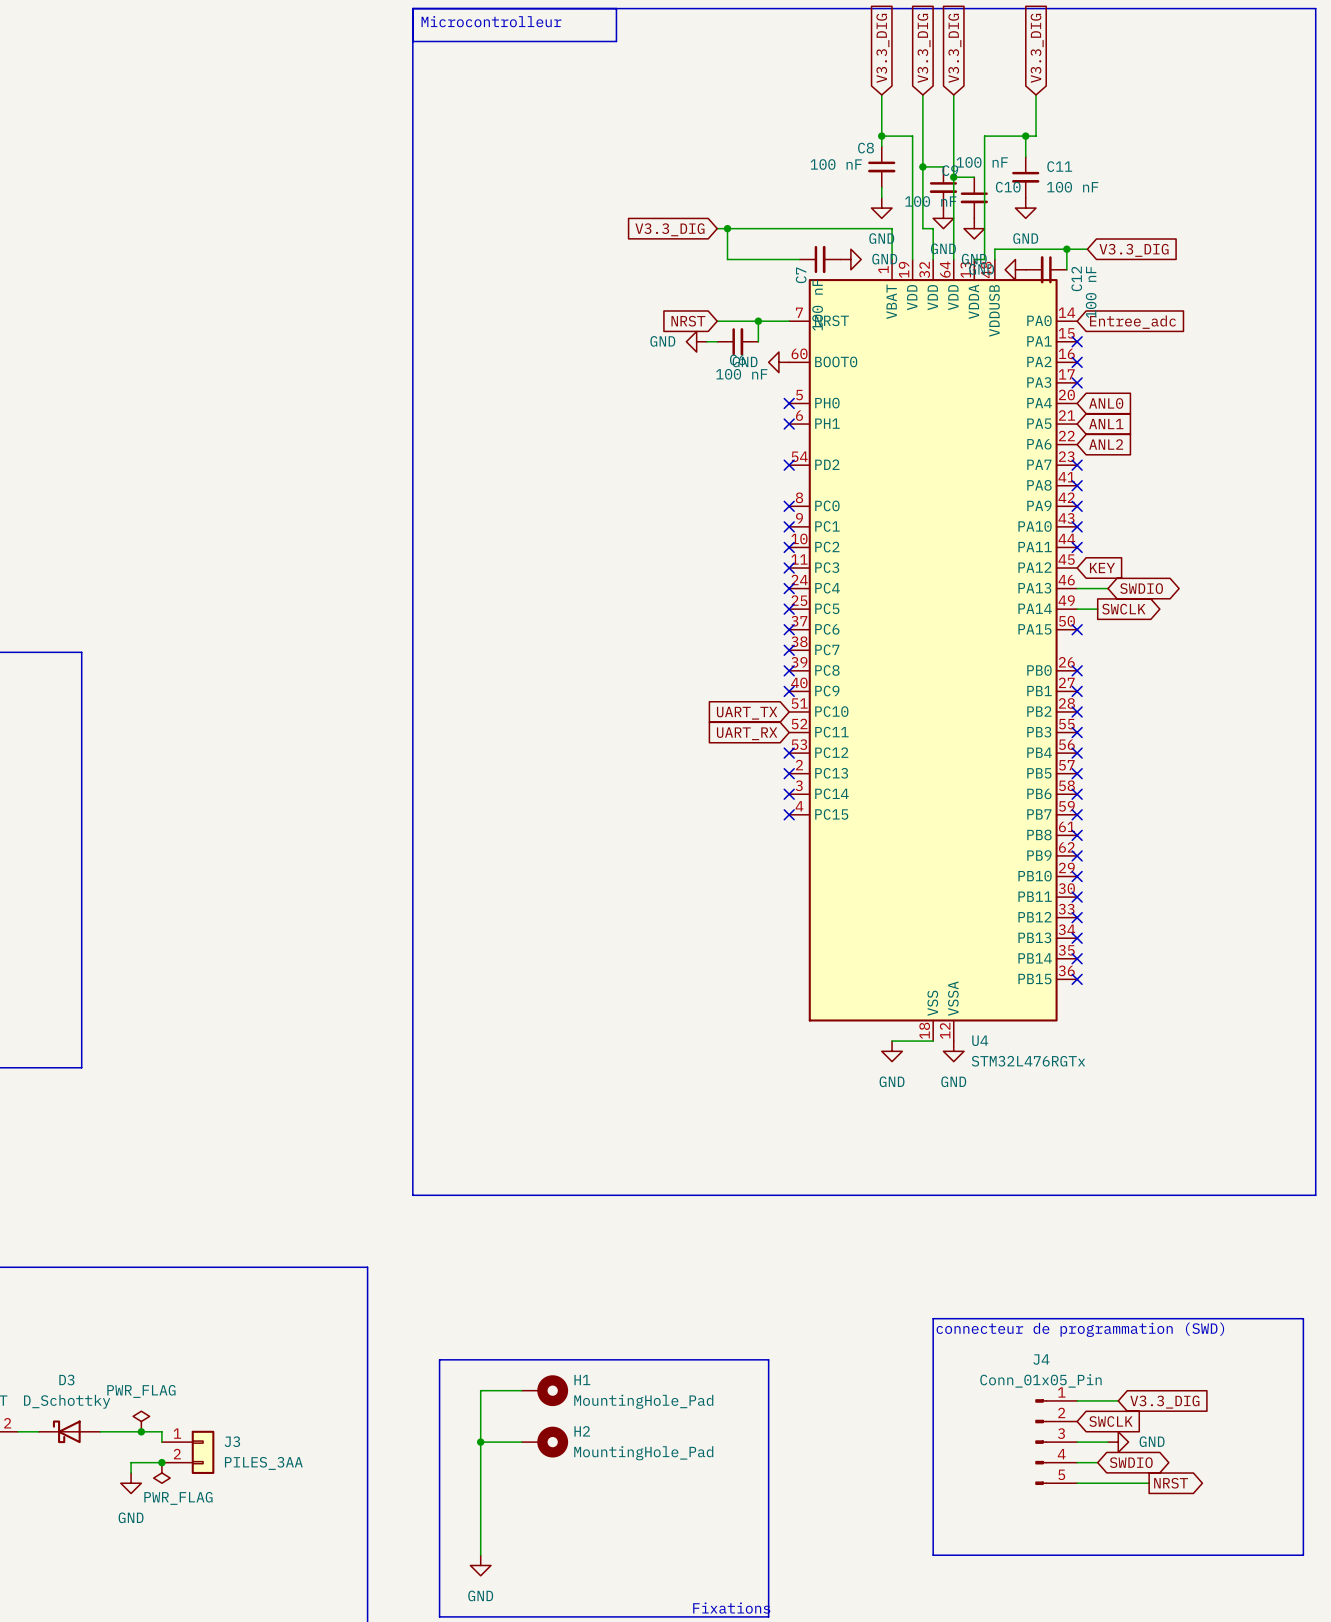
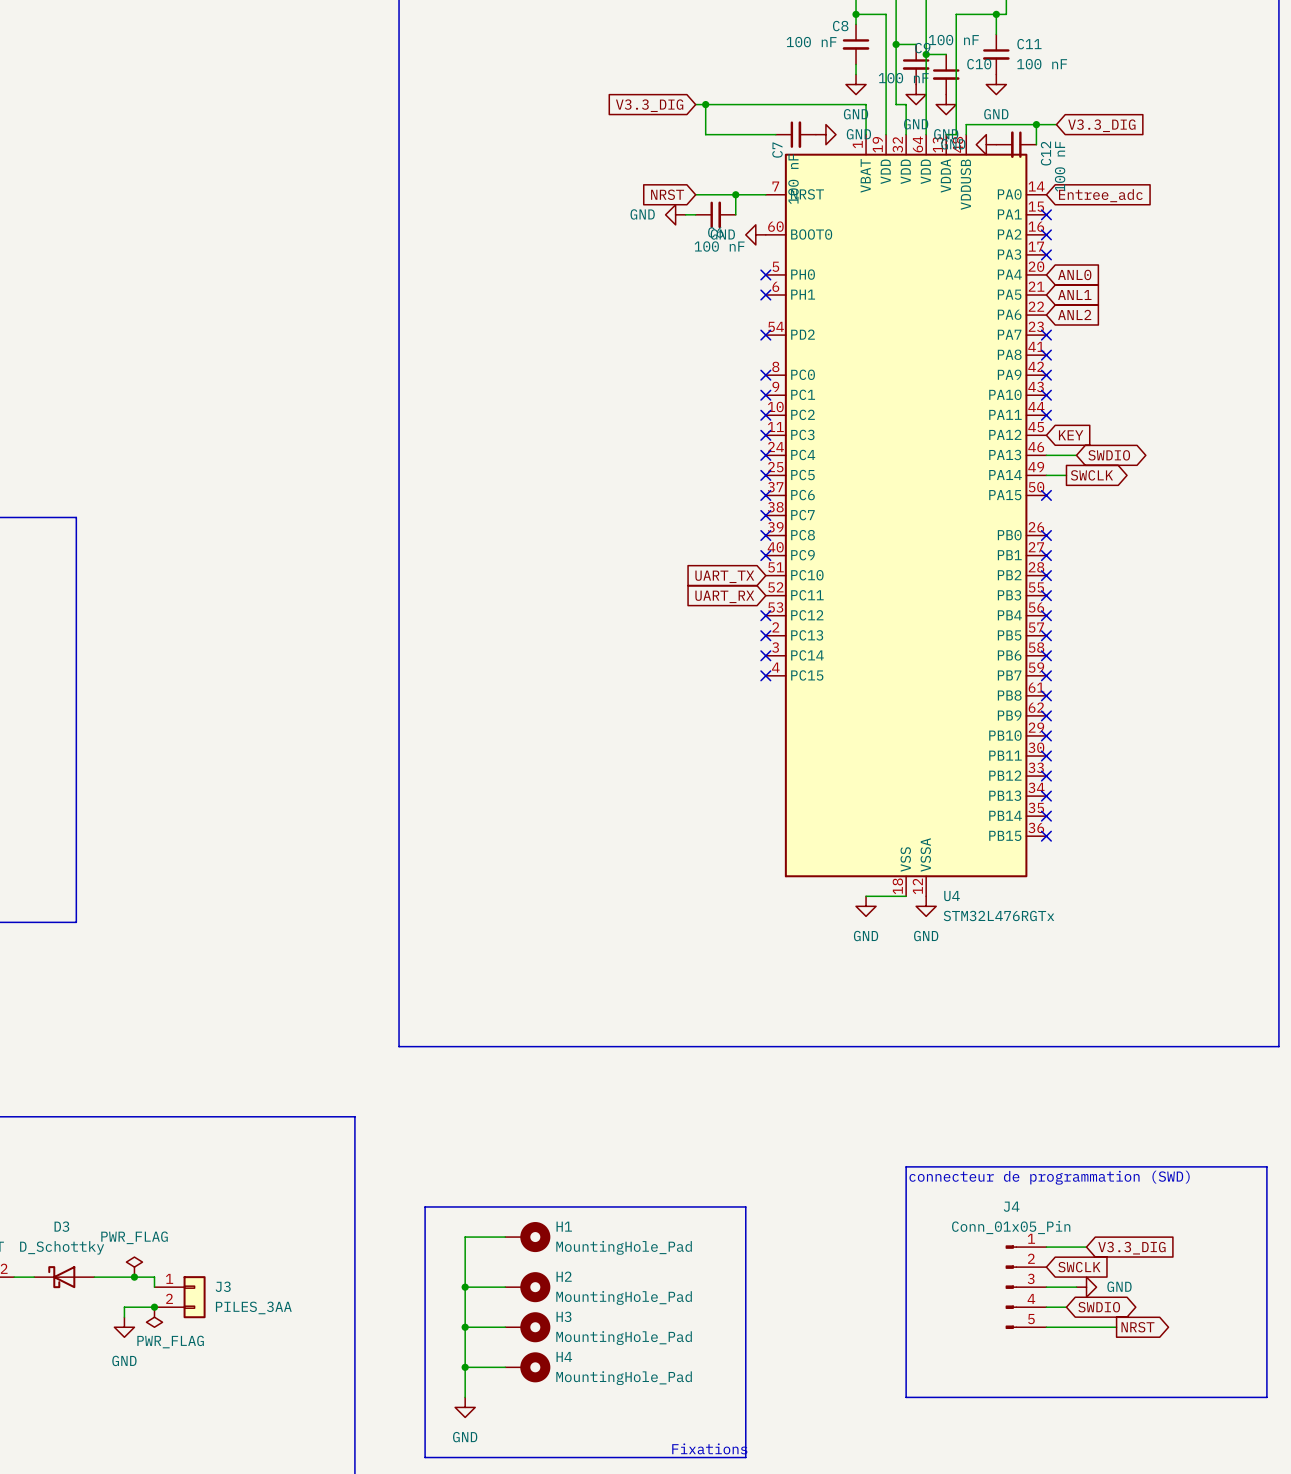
wire: none -> (465, 1327) (505, 1327)
junction: none -> (465, 1327)
H3: none -> MountingHole_Pad (527, 1327)
wire: none -> (465, 1367) (505, 1367)
junction: none -> (465, 1367)
H4: none -> MountingHole_Pad (527, 1367)

